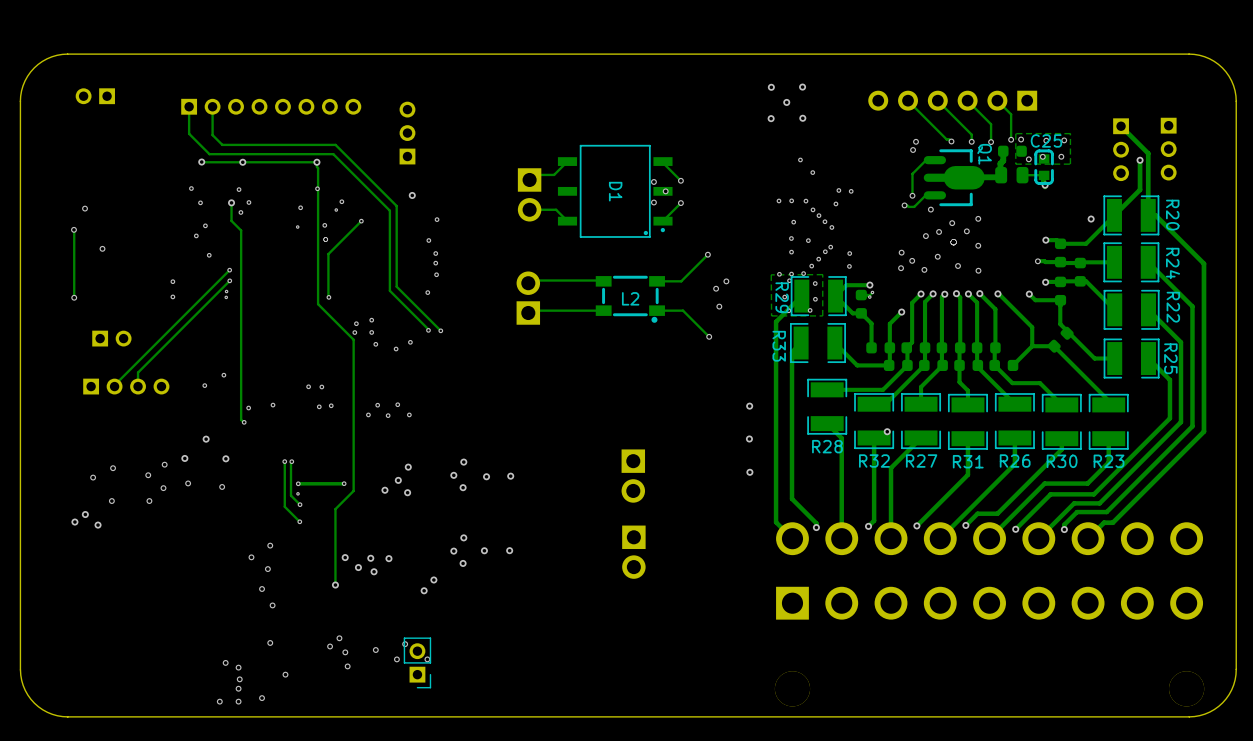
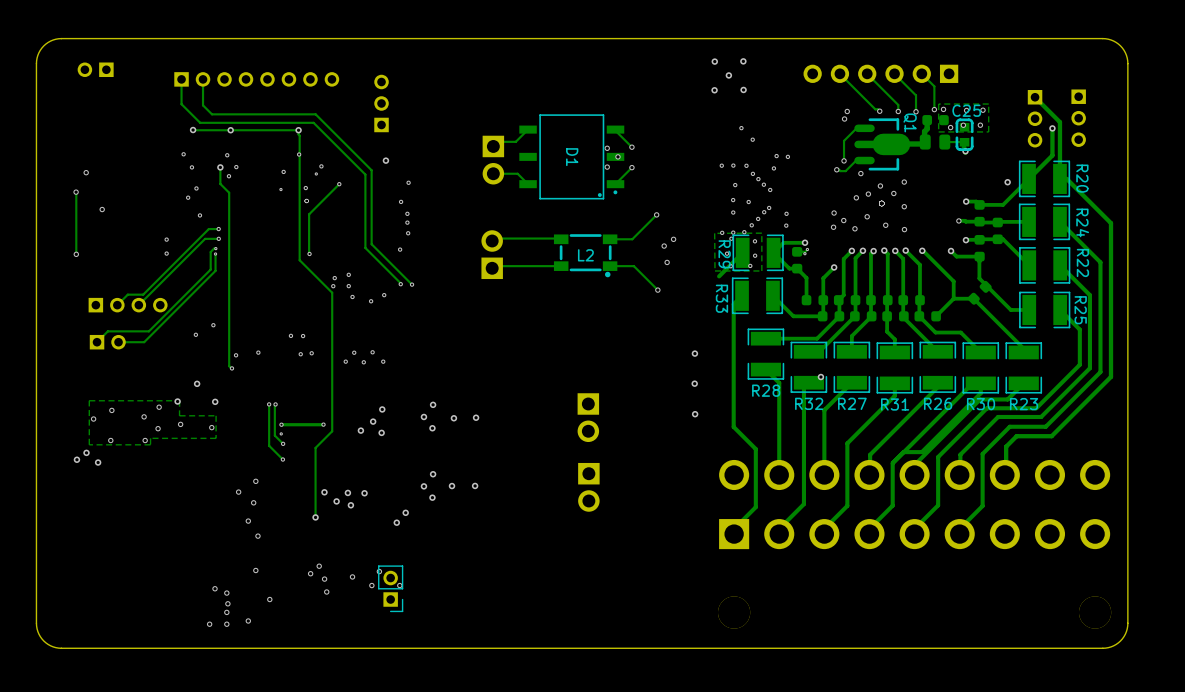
board edge: none -> (1102, 38) (61, 38) (48, 42) (40, 50) (36, 63) (36, 623) (40, 636) (50, 645) (61, 648) (1102, 648) (1116, 644) (1124, 636) (1127, 623) (1127, 63) (1125, 52) (1120, 45) (1113, 41) (1102, 38)
board edge: (20, 101) (20, 669) -> none
board edge: (20, 101) (25, 80) (34, 67) (52, 56) (67, 54) (1189, 54) (1209, 58) (1222, 67) (1231, 80) (1235, 95) (1236, 669) (1235, 679) (1229, 694) (1218, 706) (1209, 712) (1189, 716) (67, 716) -> none
track: (229, 270) (114, 386) -> (218, 229) (208, 229) (143, 294) (127, 294) (117, 305)
track: (229, 280) (138, 372) (138, 386) -> (218, 238) (205, 238) (138, 305)
track: none -> (215, 248) (210, 251) (210, 269) (148, 331) (107, 331) (97, 342)
track: none -> (215, 254) (215, 270) (144, 342) (118, 342)
track: (776, 321) (776, 522) (792, 538) -> none
part position: (111, 338) -> (107, 342)
part position: (126, 386) -> (128, 305)
track: (874, 437) (874, 520) (868, 526) -> (808, 382) (803, 387) (803, 504) (779, 528)
track: none -> (972, 383) (892, 463) (892, 505) (870, 528)
track: (1108, 438) (1108, 462) (1087, 483) (1044, 483) (989, 538) -> (1023, 383) (1007, 399) (980, 399) (915, 464) (915, 469)
track: (1014, 442) (1014, 464) (940, 538) -> (937, 387) (870, 454) (870, 469)
track: (967, 452) (967, 474) (916, 525) -> (894, 395) (847, 443) (847, 505) (825, 528)
zone outline: none -> (179, 400) (89, 400) (89, 444) (150, 444) (150, 438) (216, 438) (216, 415) (179, 415) (179, 400)
track: (1122, 465) (1093, 494) (1050, 494) (1015, 529) -> (1036, 408) (986, 408) (938, 457) (938, 505) (915, 528)
track: (1127, 475) (1099, 503) (1074, 503) (1038, 538) -> (1041, 416) (998, 416) (960, 454) (960, 469)
track: (792, 486) (792, 498) (816, 523) (816, 527) -> (733, 426) (755, 449) (755, 507) (734, 528)
track: (1132, 486) (1106, 512) (1077, 512) (1064, 524) (1064, 529) -> (1045, 426) (1009, 426) (982, 453) (982, 505) (960, 528)
track: (1139, 496) (1112, 522) (1104, 522) (1088, 538) -> (1051, 436) (1016, 436) (1006, 446) (1005, 469)
via: (916, 525) -> none
via: (965, 525) -> none
via: (868, 526) -> none
via: (816, 527) -> none
via: (1015, 529) -> none
via: (1064, 529) -> none
board edge: (20, 669) (23, 685) (34, 703) (52, 714) (67, 716) -> none

